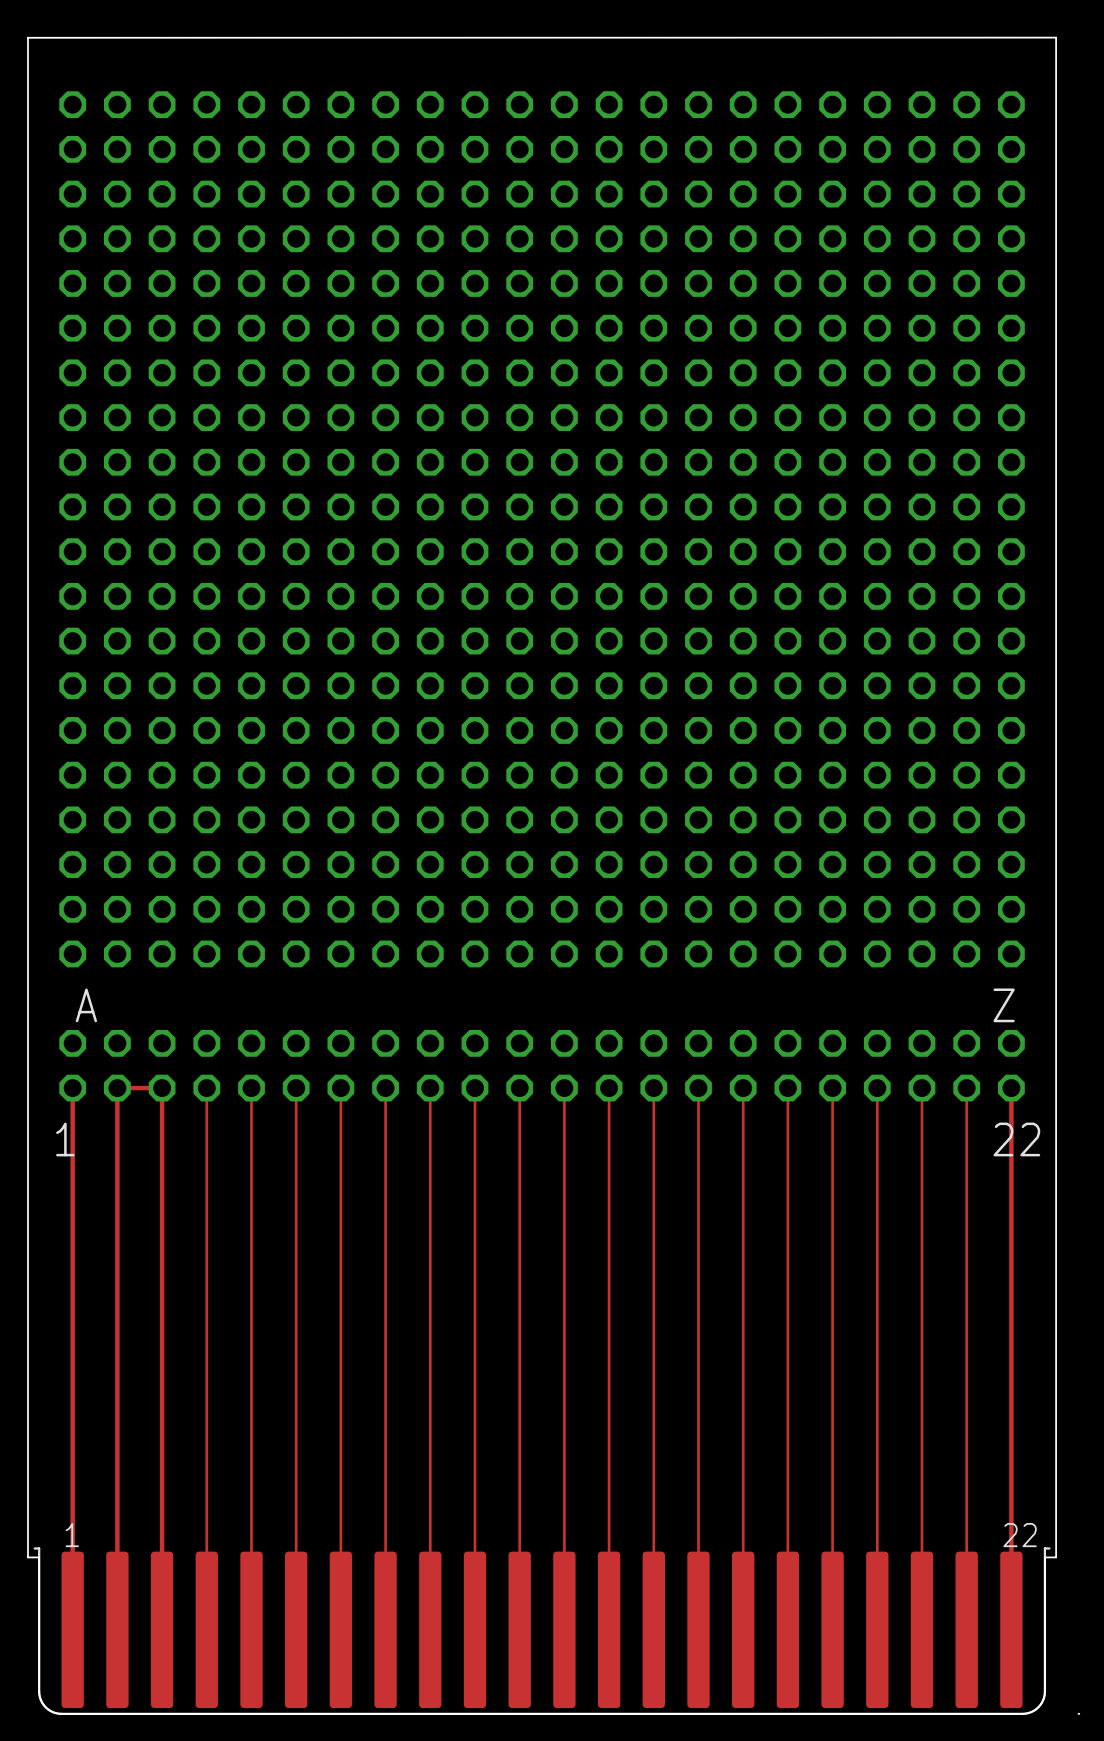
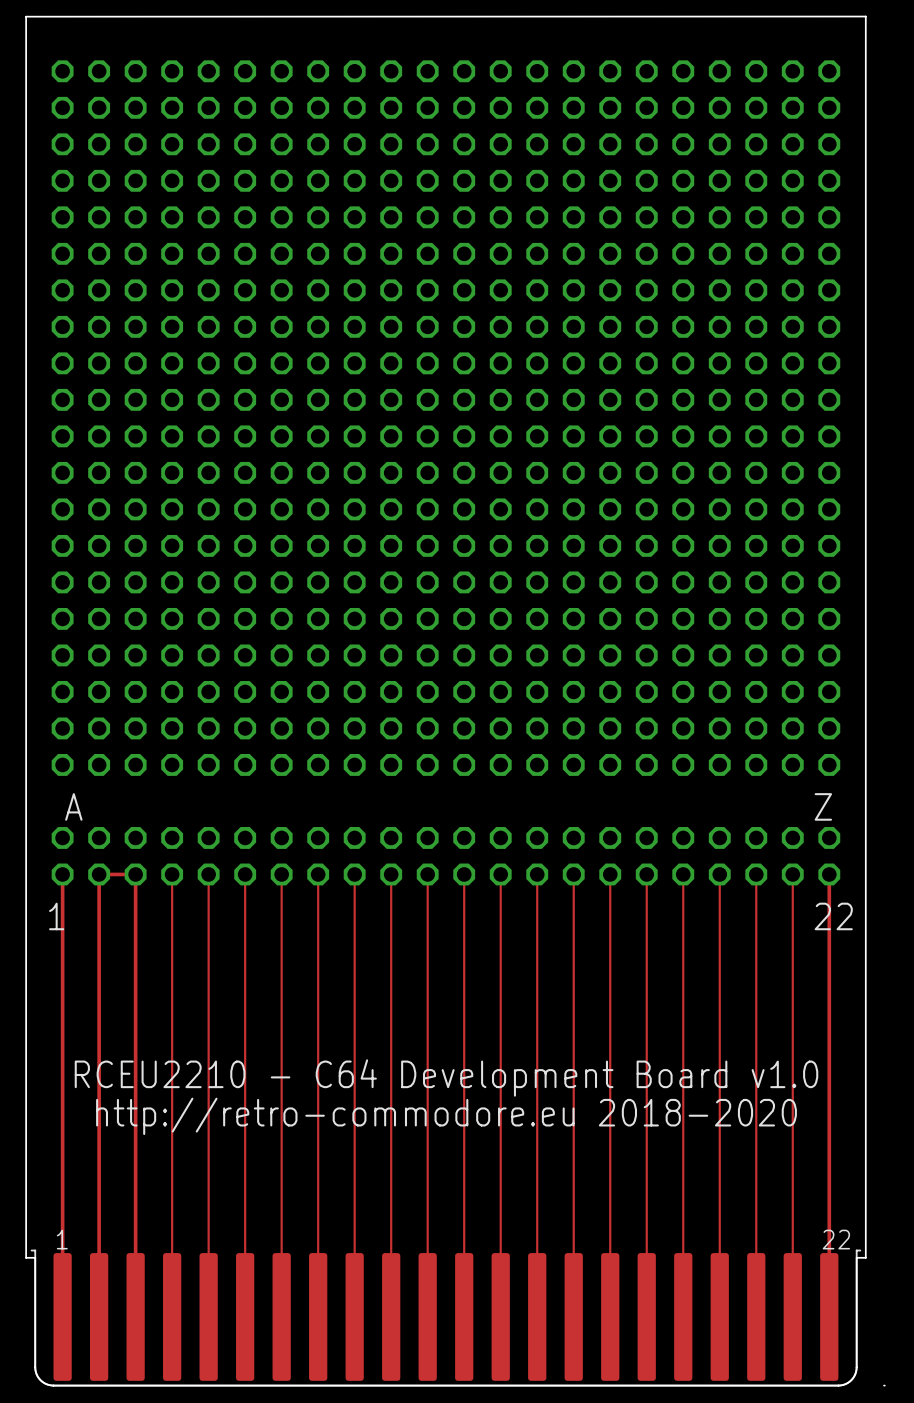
text: none -> RCEU2210 - C64 Development Board v1.0 (446, 1078)
text: none -> http://retro-commodore.eu 2018-2020 (446, 1116)

